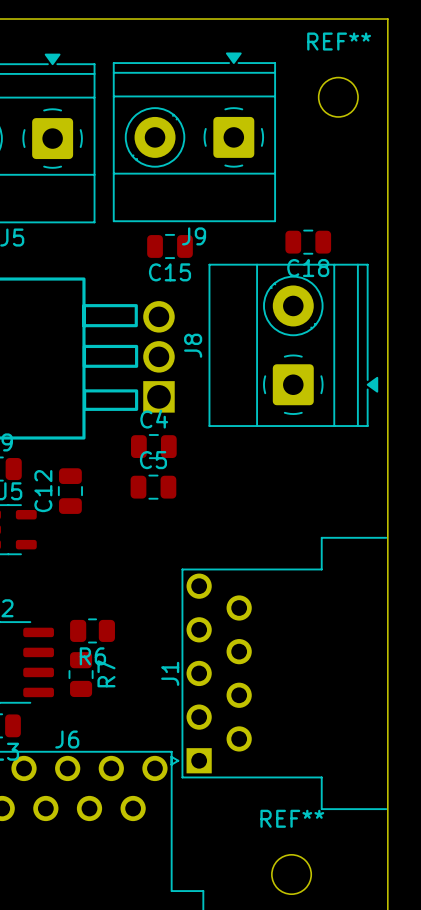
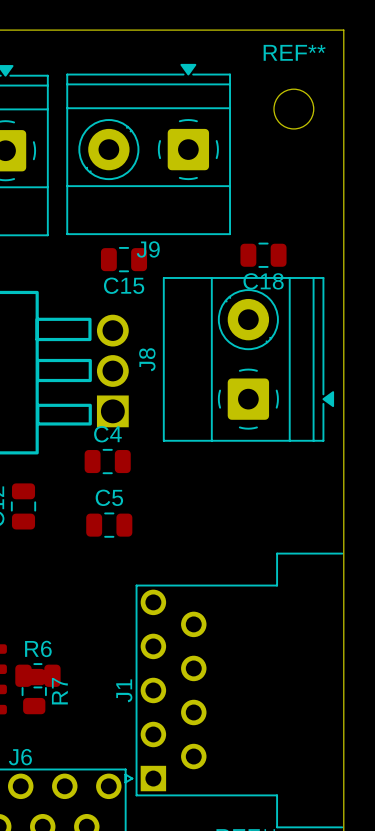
C5 position: (153, 487) -> (109, 525)
R6 position: (92, 630) -> (37, 675)
R6 name position: R6 (92, 656) -> R6 (38, 648)

